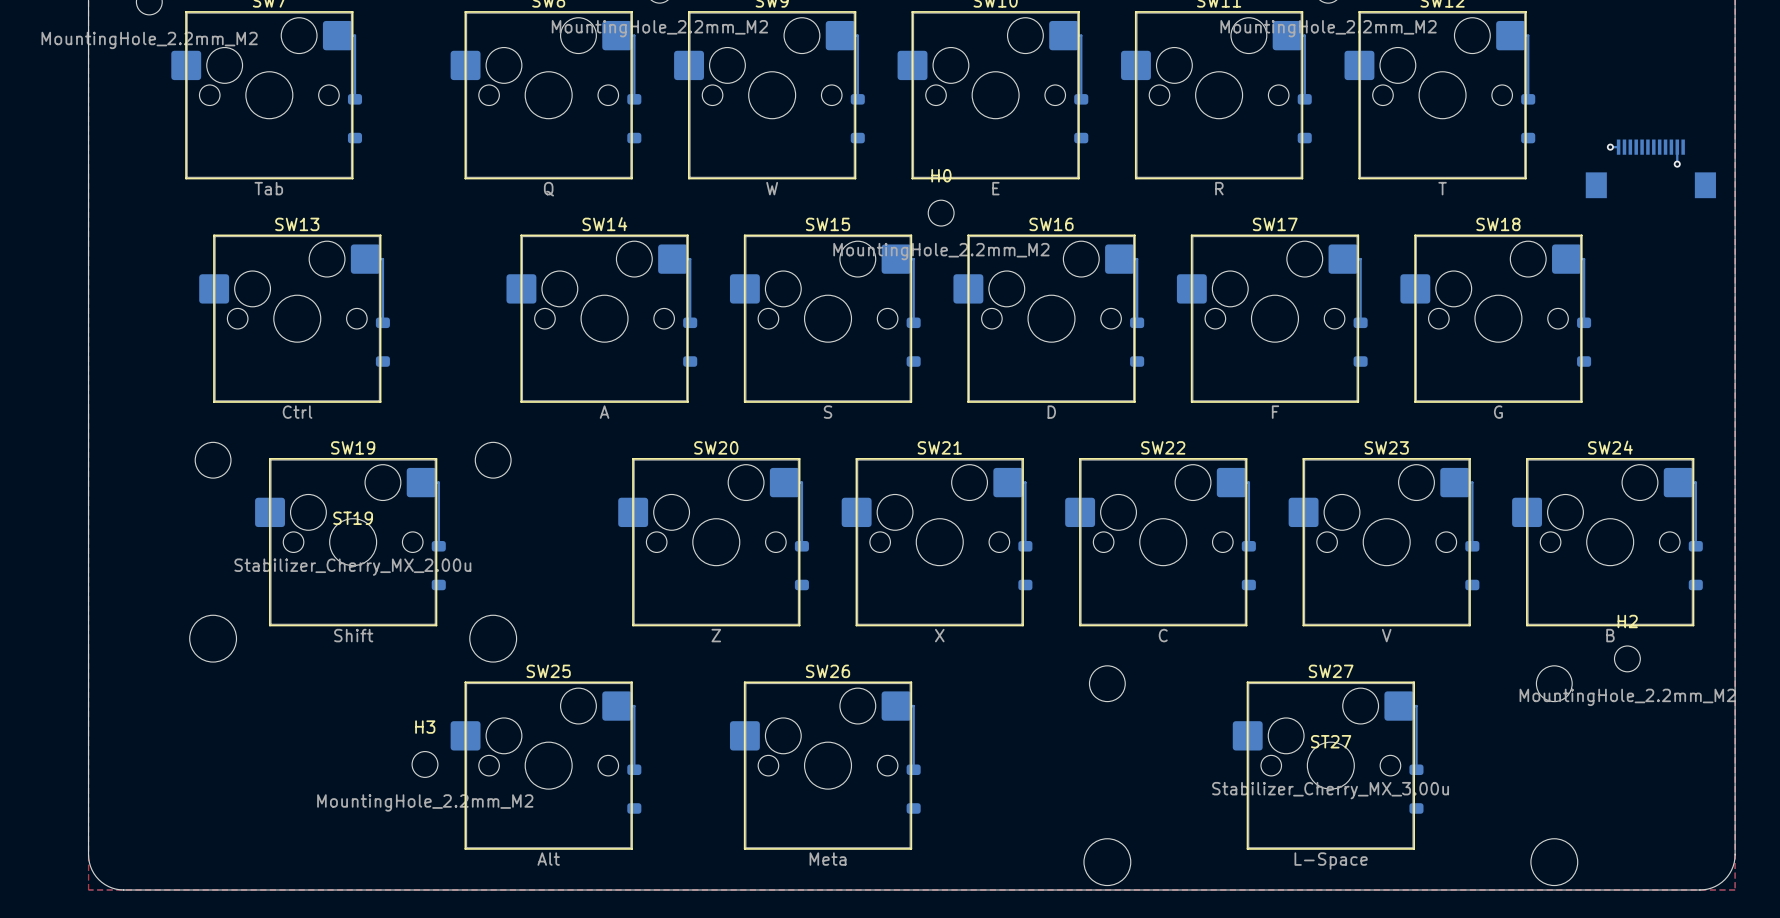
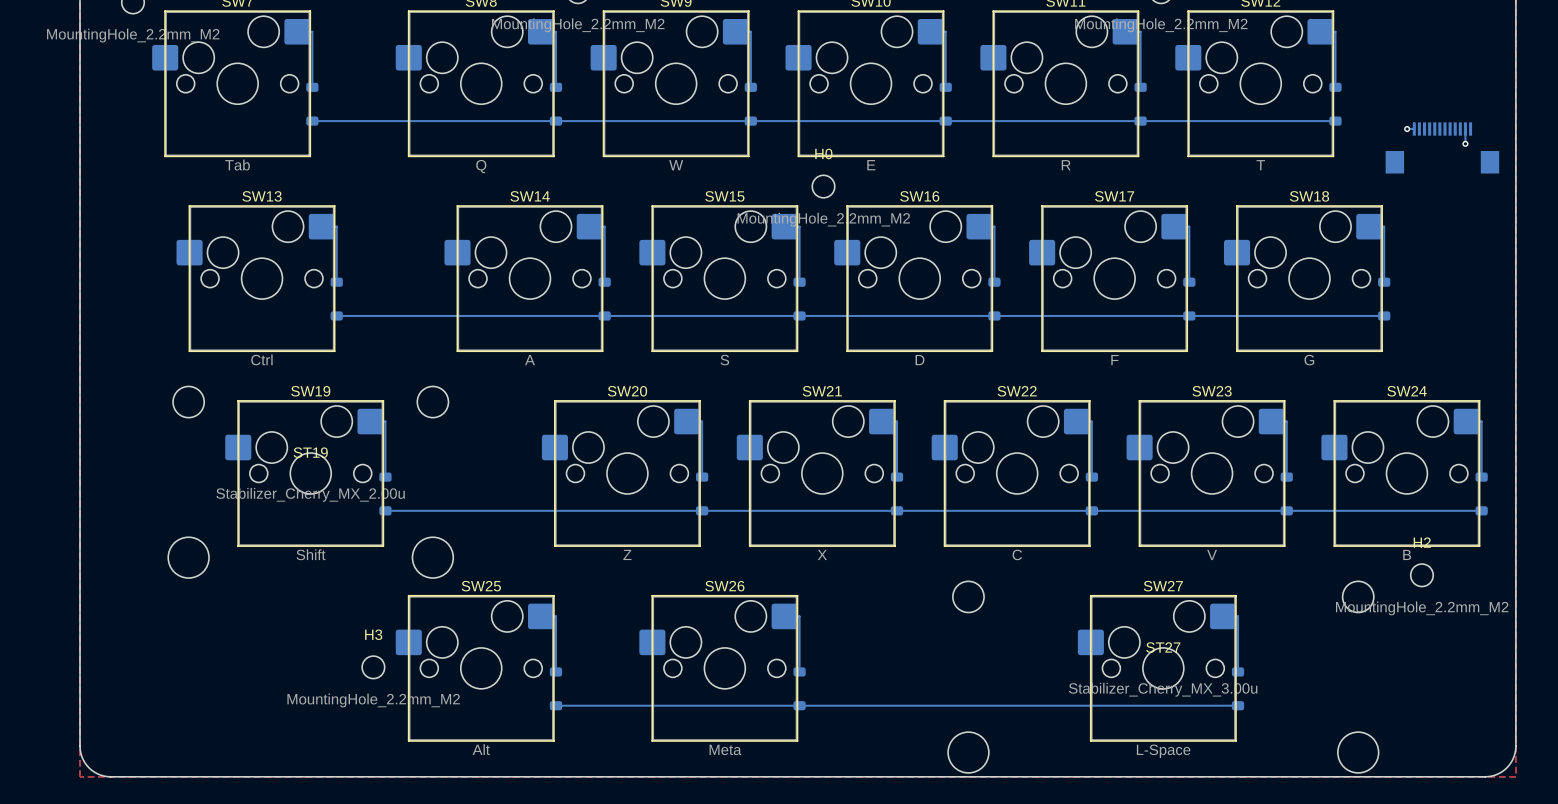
bottom track: none -> (312, 121) (1335, 121)
bottom track: none -> (336, 315) (1384, 315)
bottom track: none -> (385, 510) (1481, 510)
bottom track: none -> (555, 705) (1238, 705)

